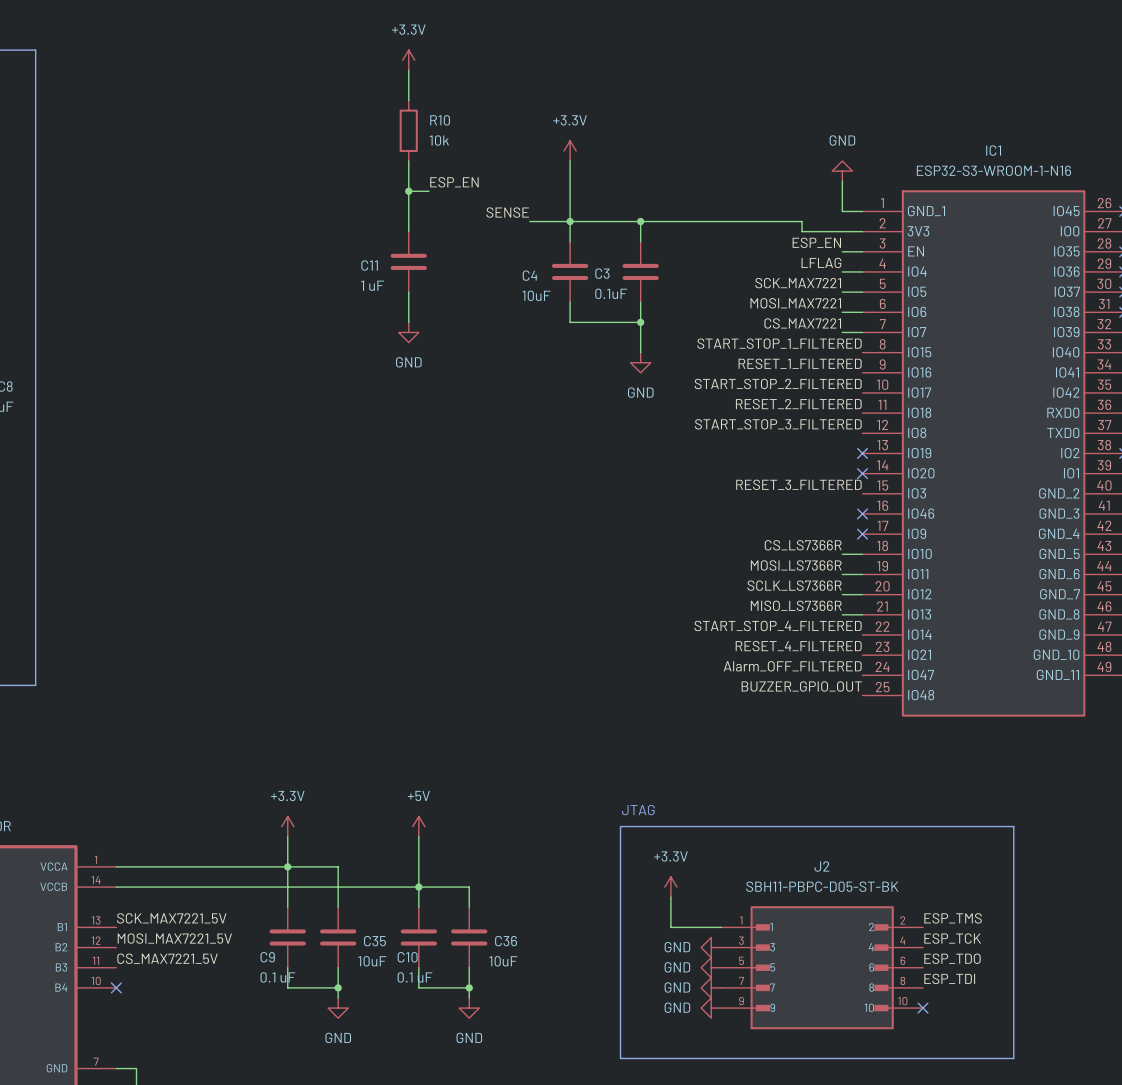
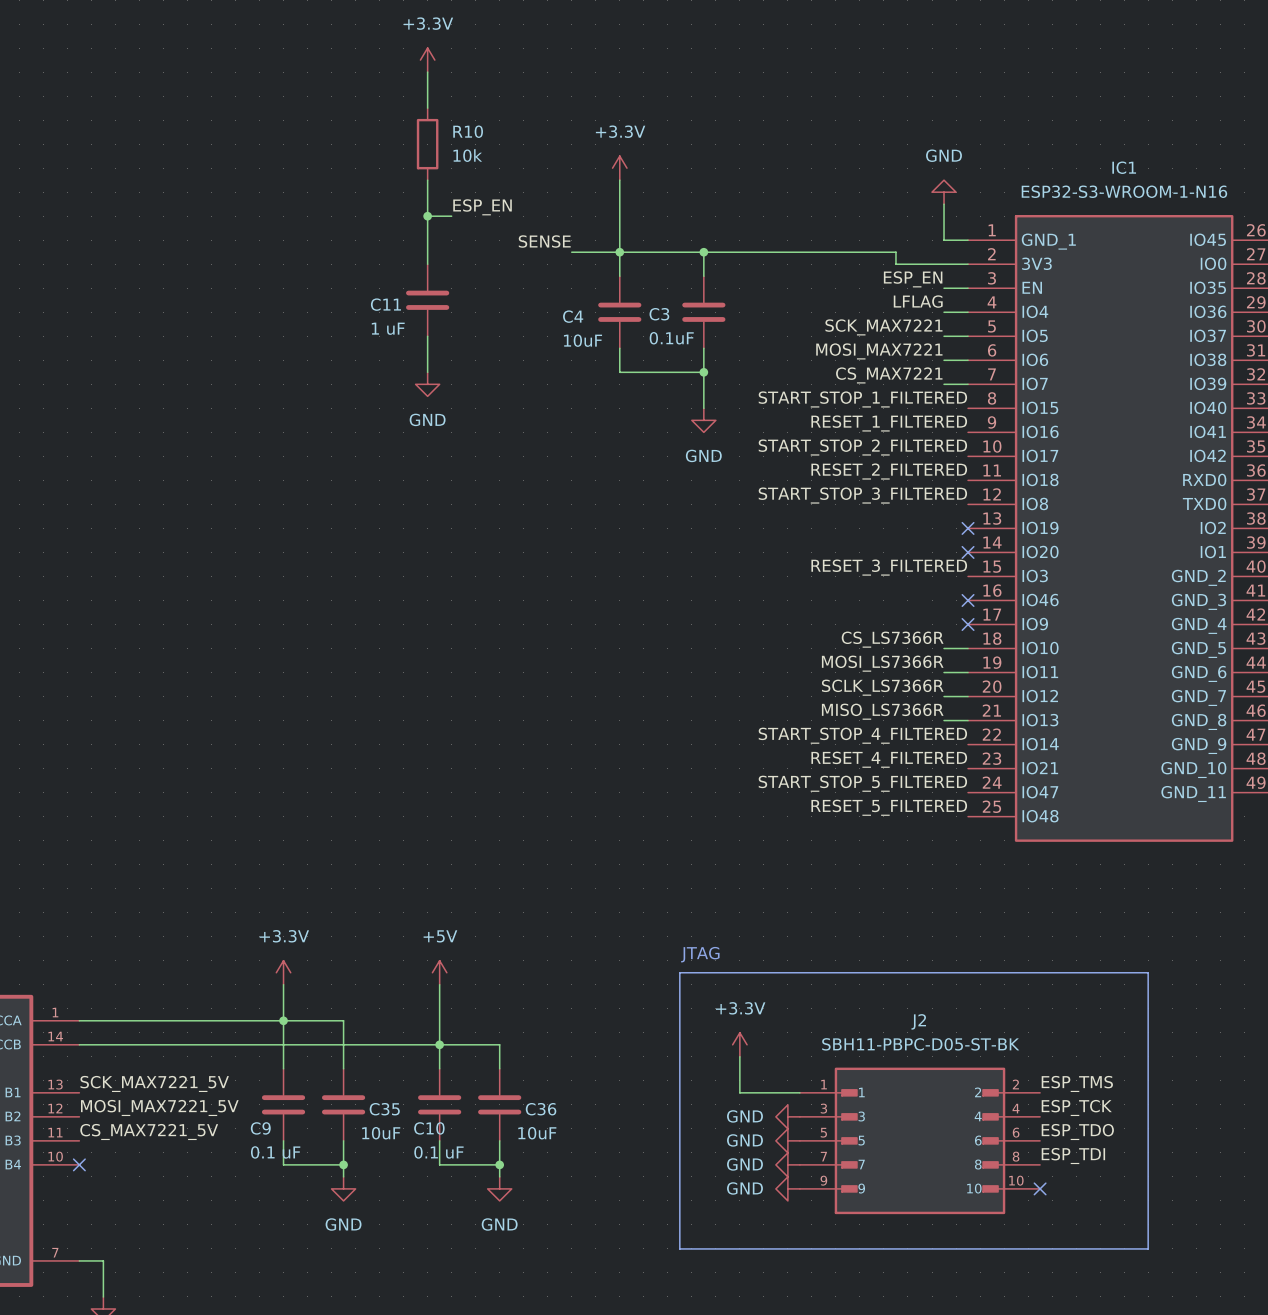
label: Alarm_OFF_FILTERED (792, 666) -> START_STOP_5_FILTERED (862, 783)
label: BUZZER_GPIO_OUT (801, 686) -> RESET_5_FILTERED (889, 807)

